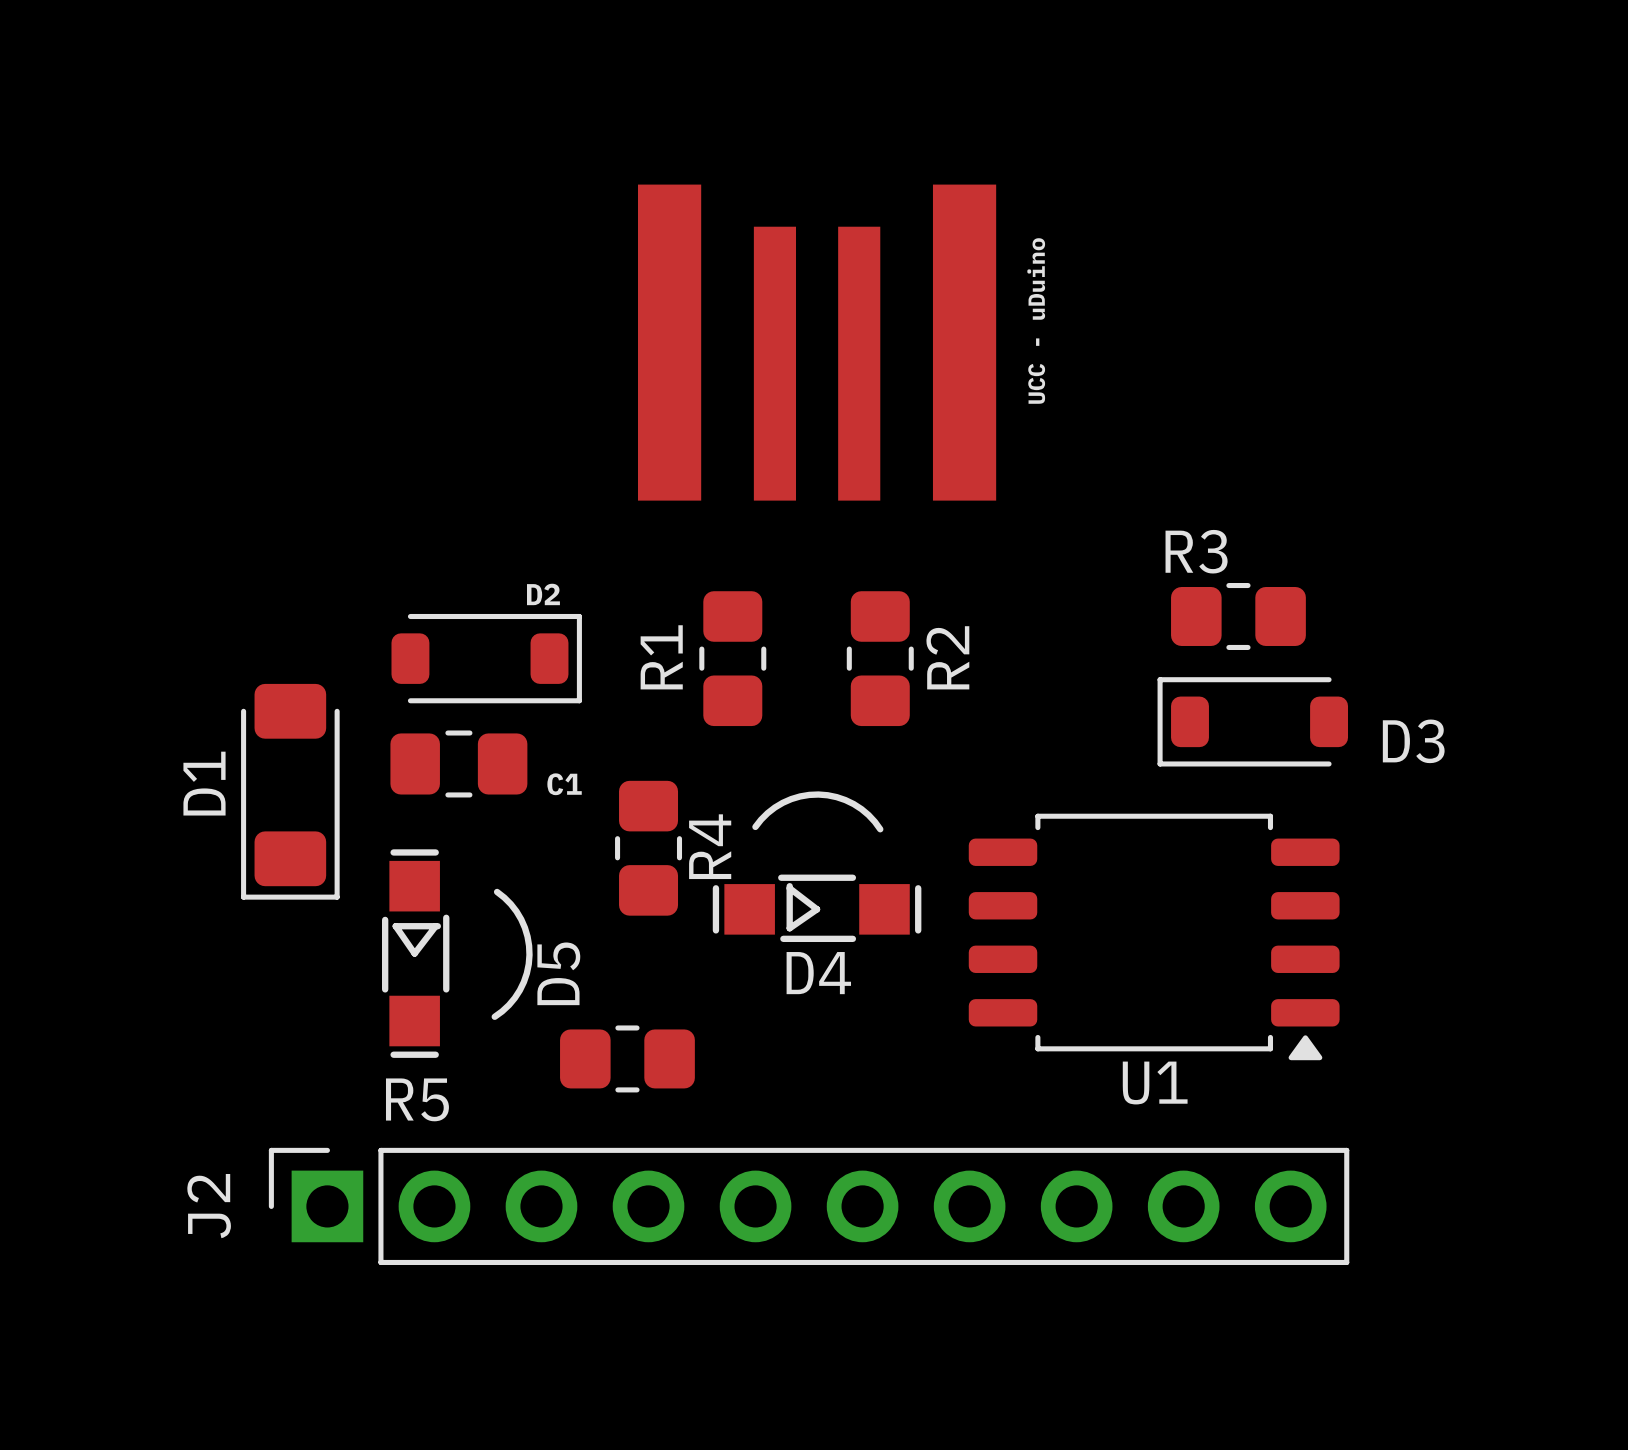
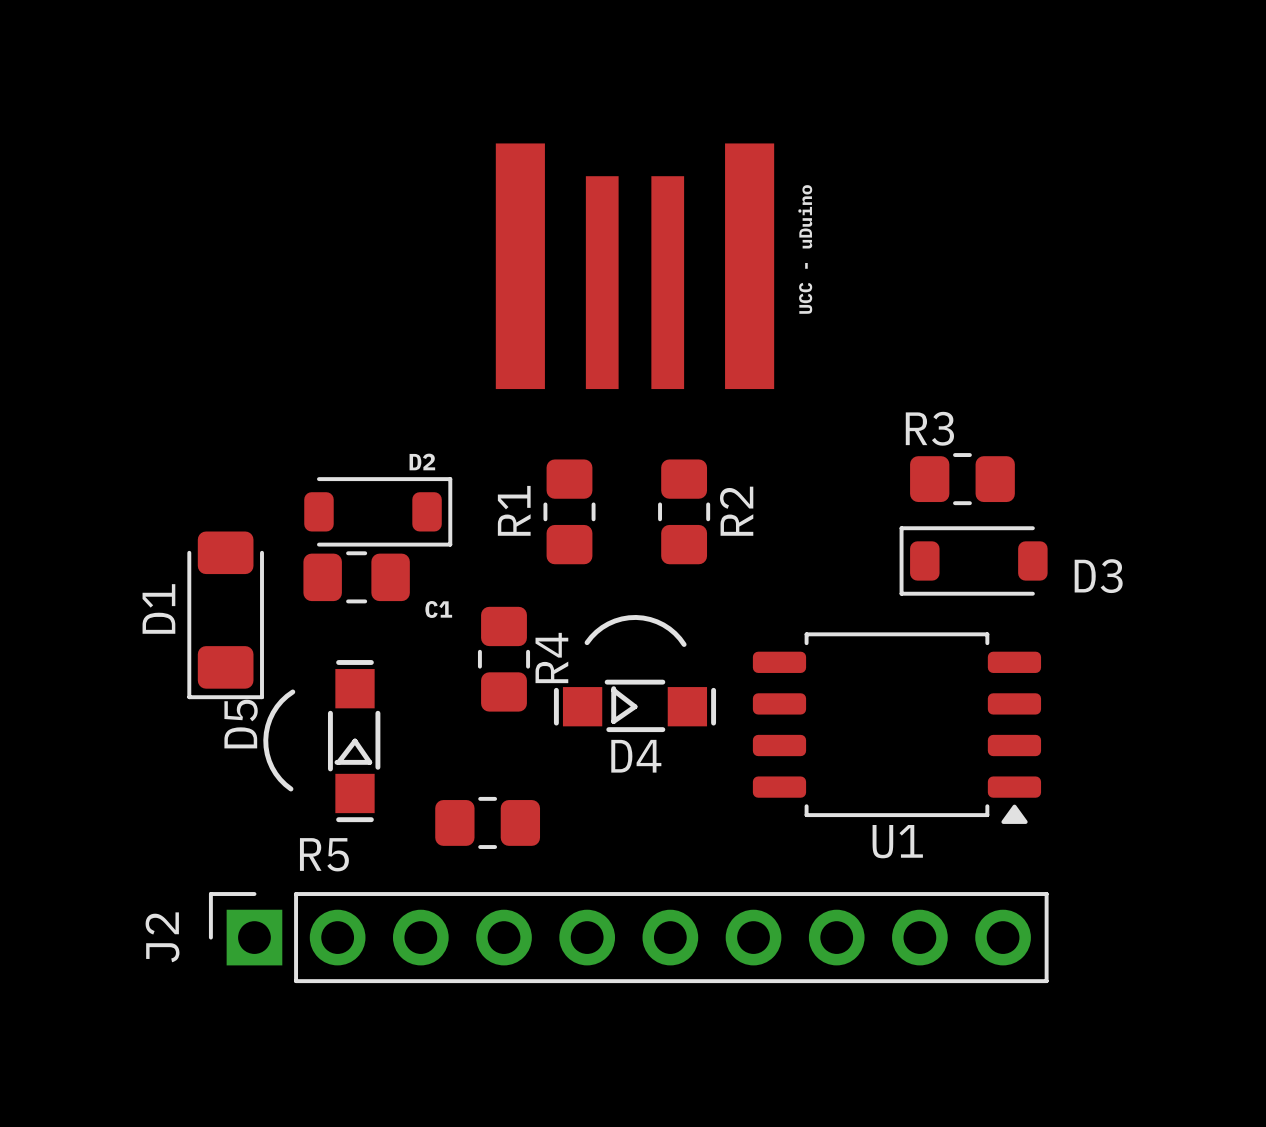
C1 position: (458, 763) -> (356, 577)
D5 rotation: 0° (457, 953) -> 180° (321, 741)

